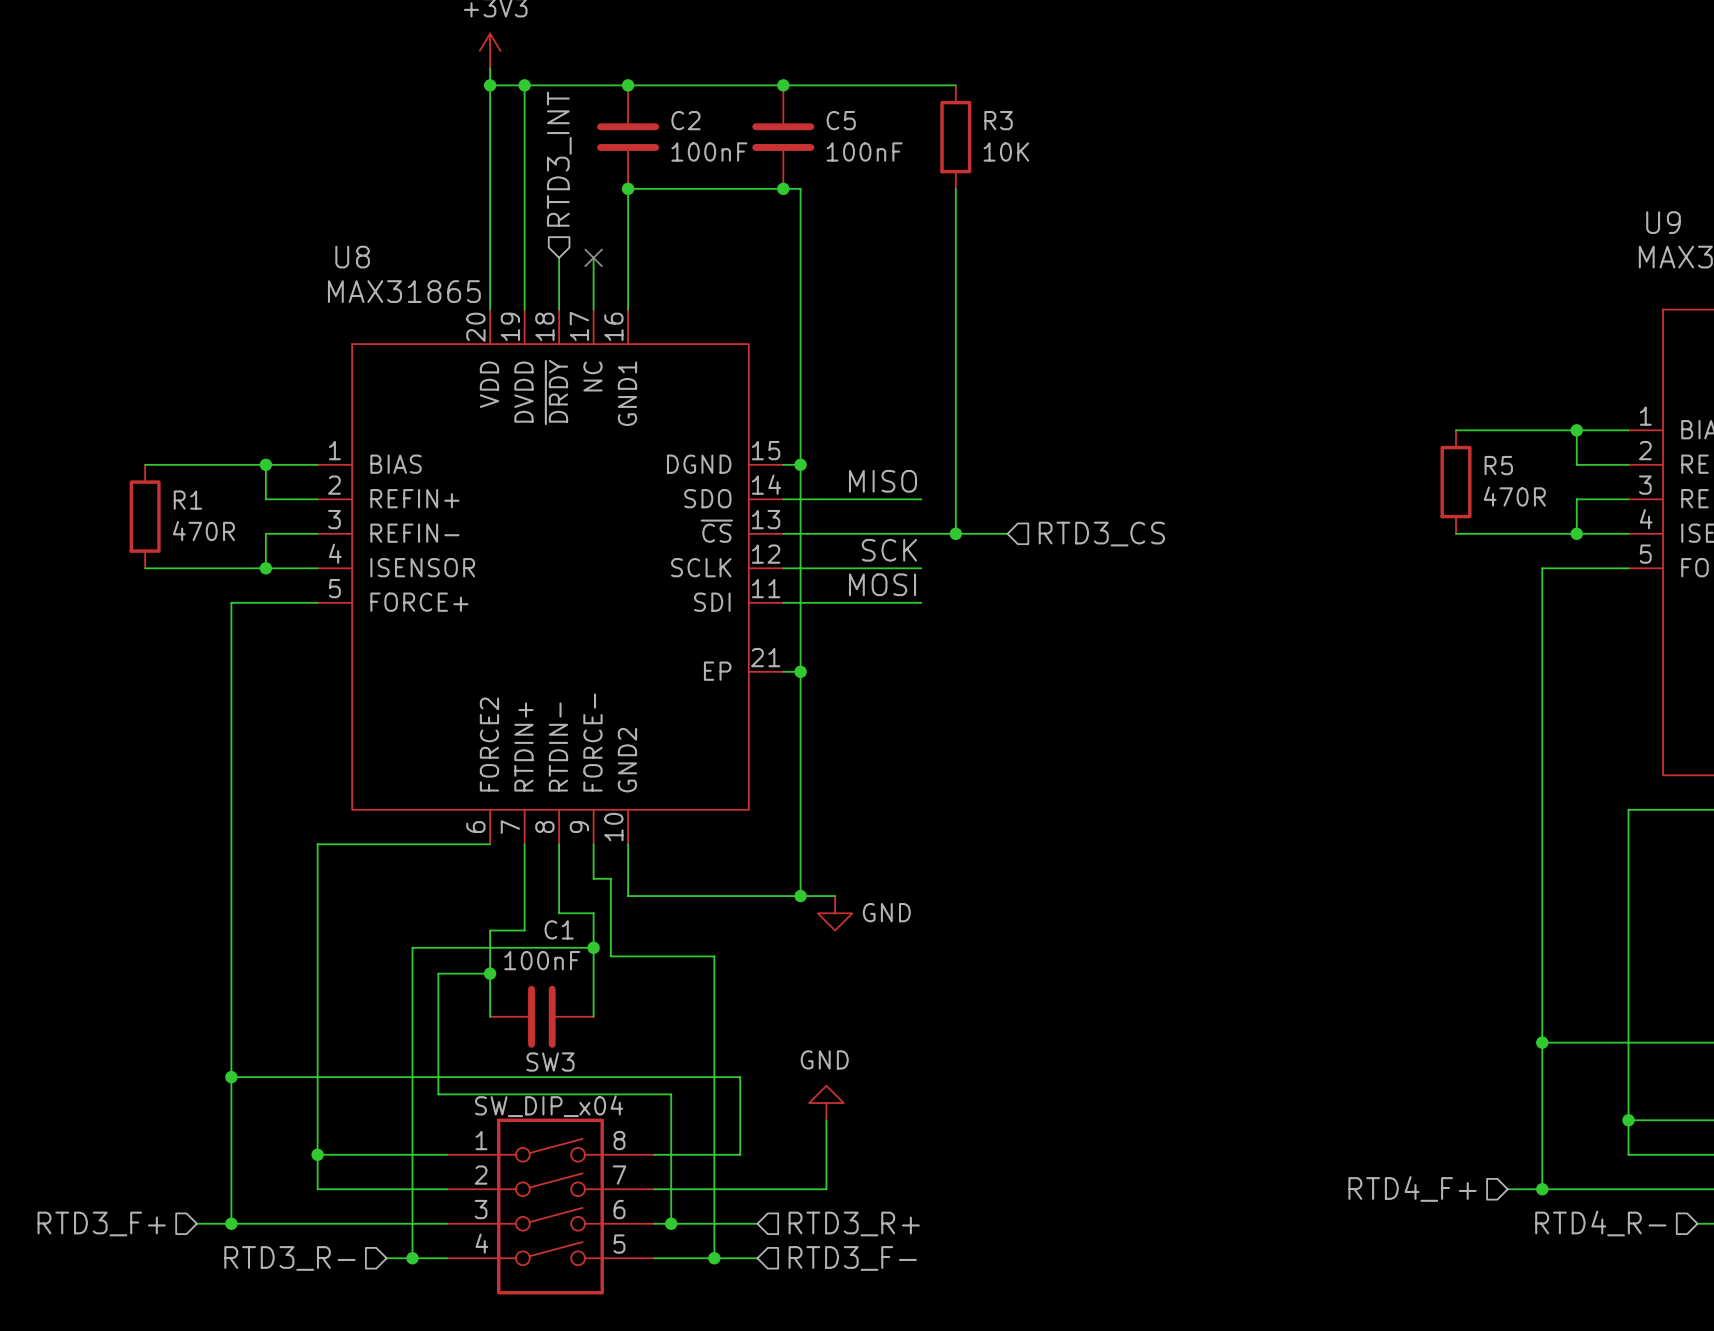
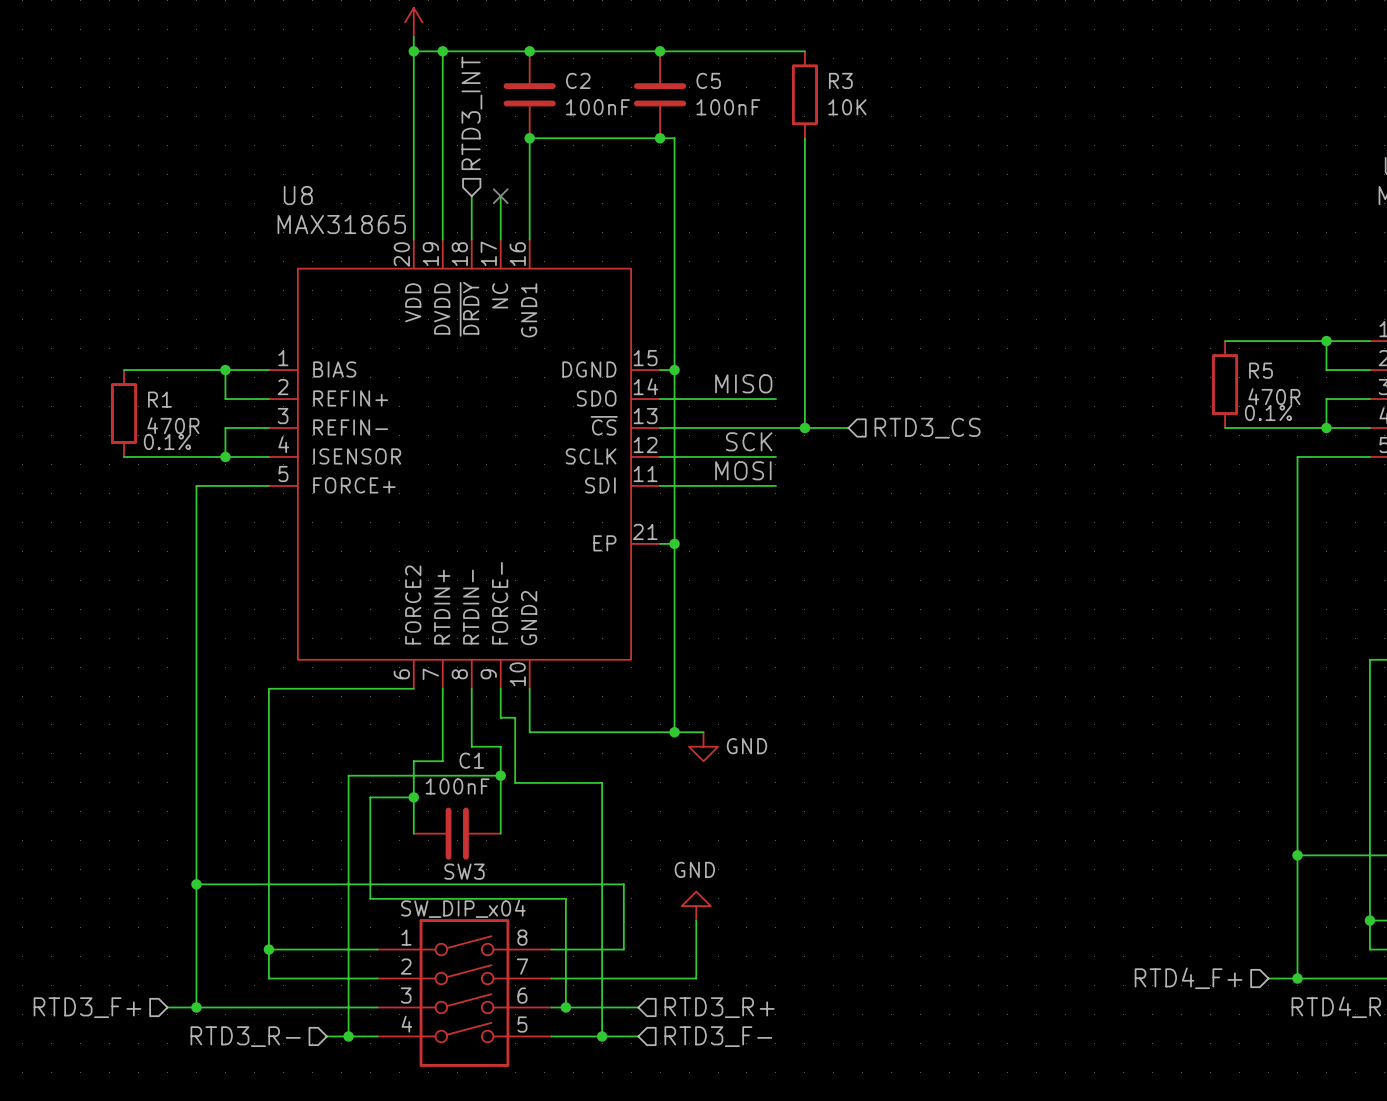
R5 text: none -> 0.1% (1268, 412)
R1 text: none -> 0.1% (167, 441)

